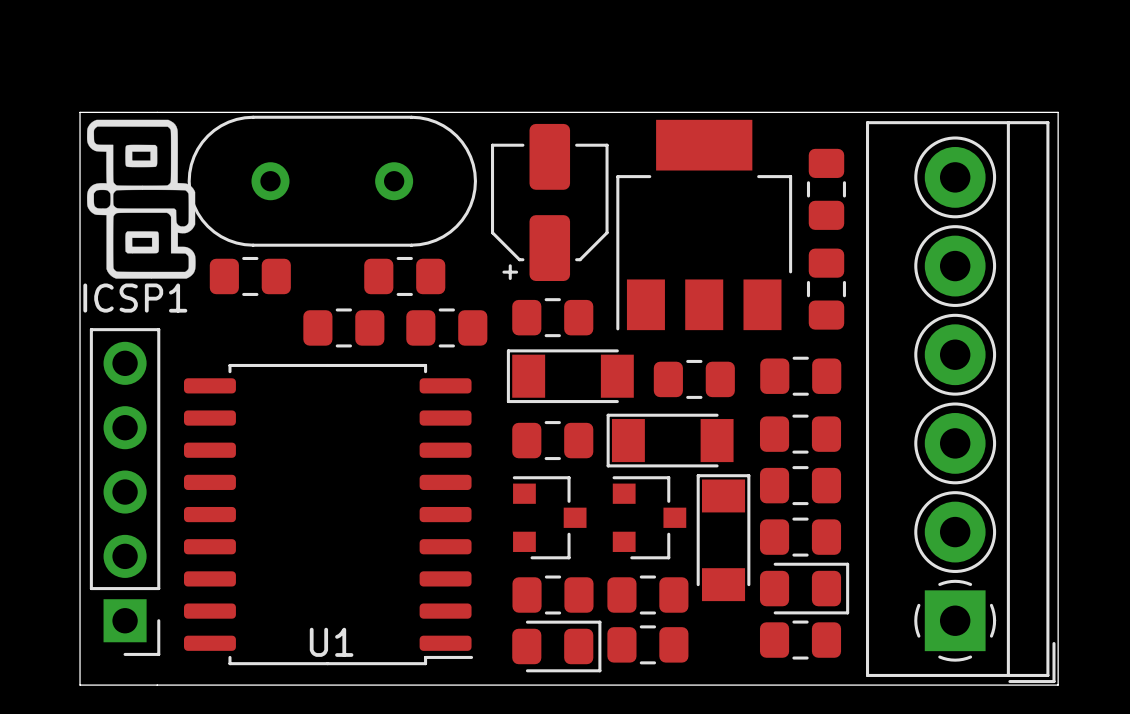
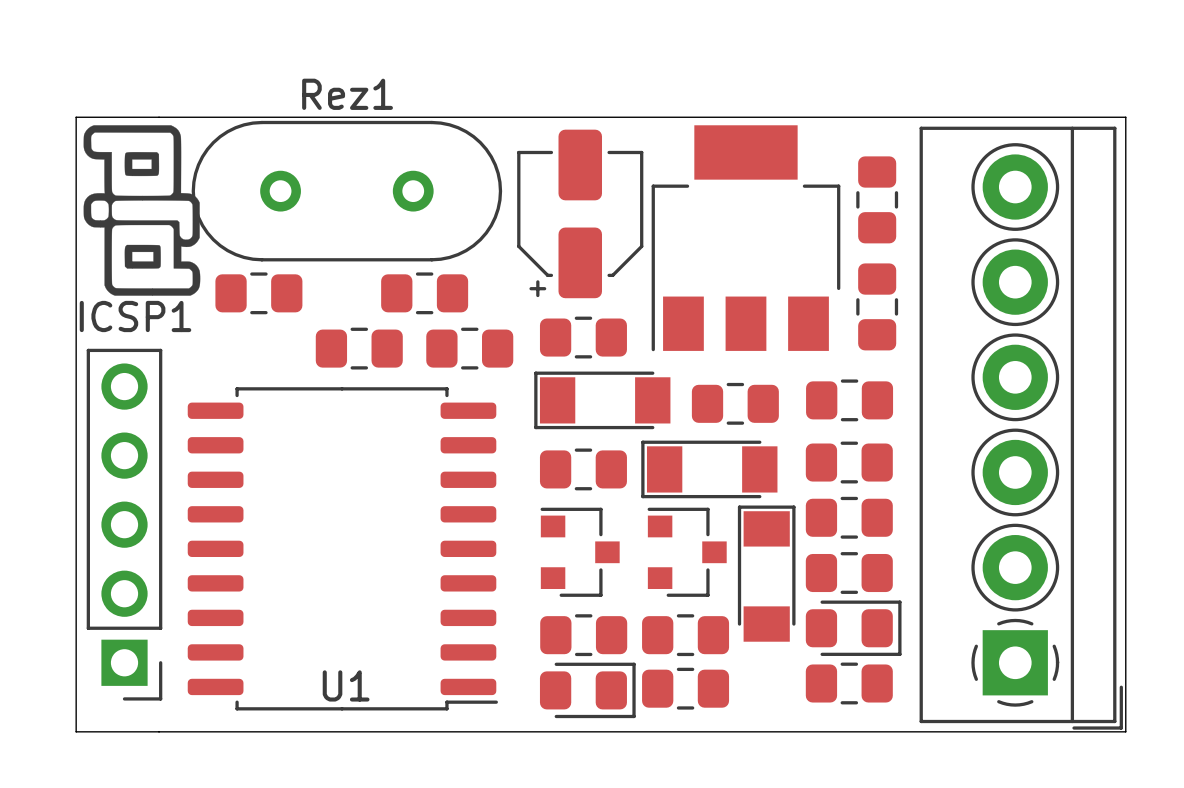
Rez1 name: none -> Rez1 (347, 94)

